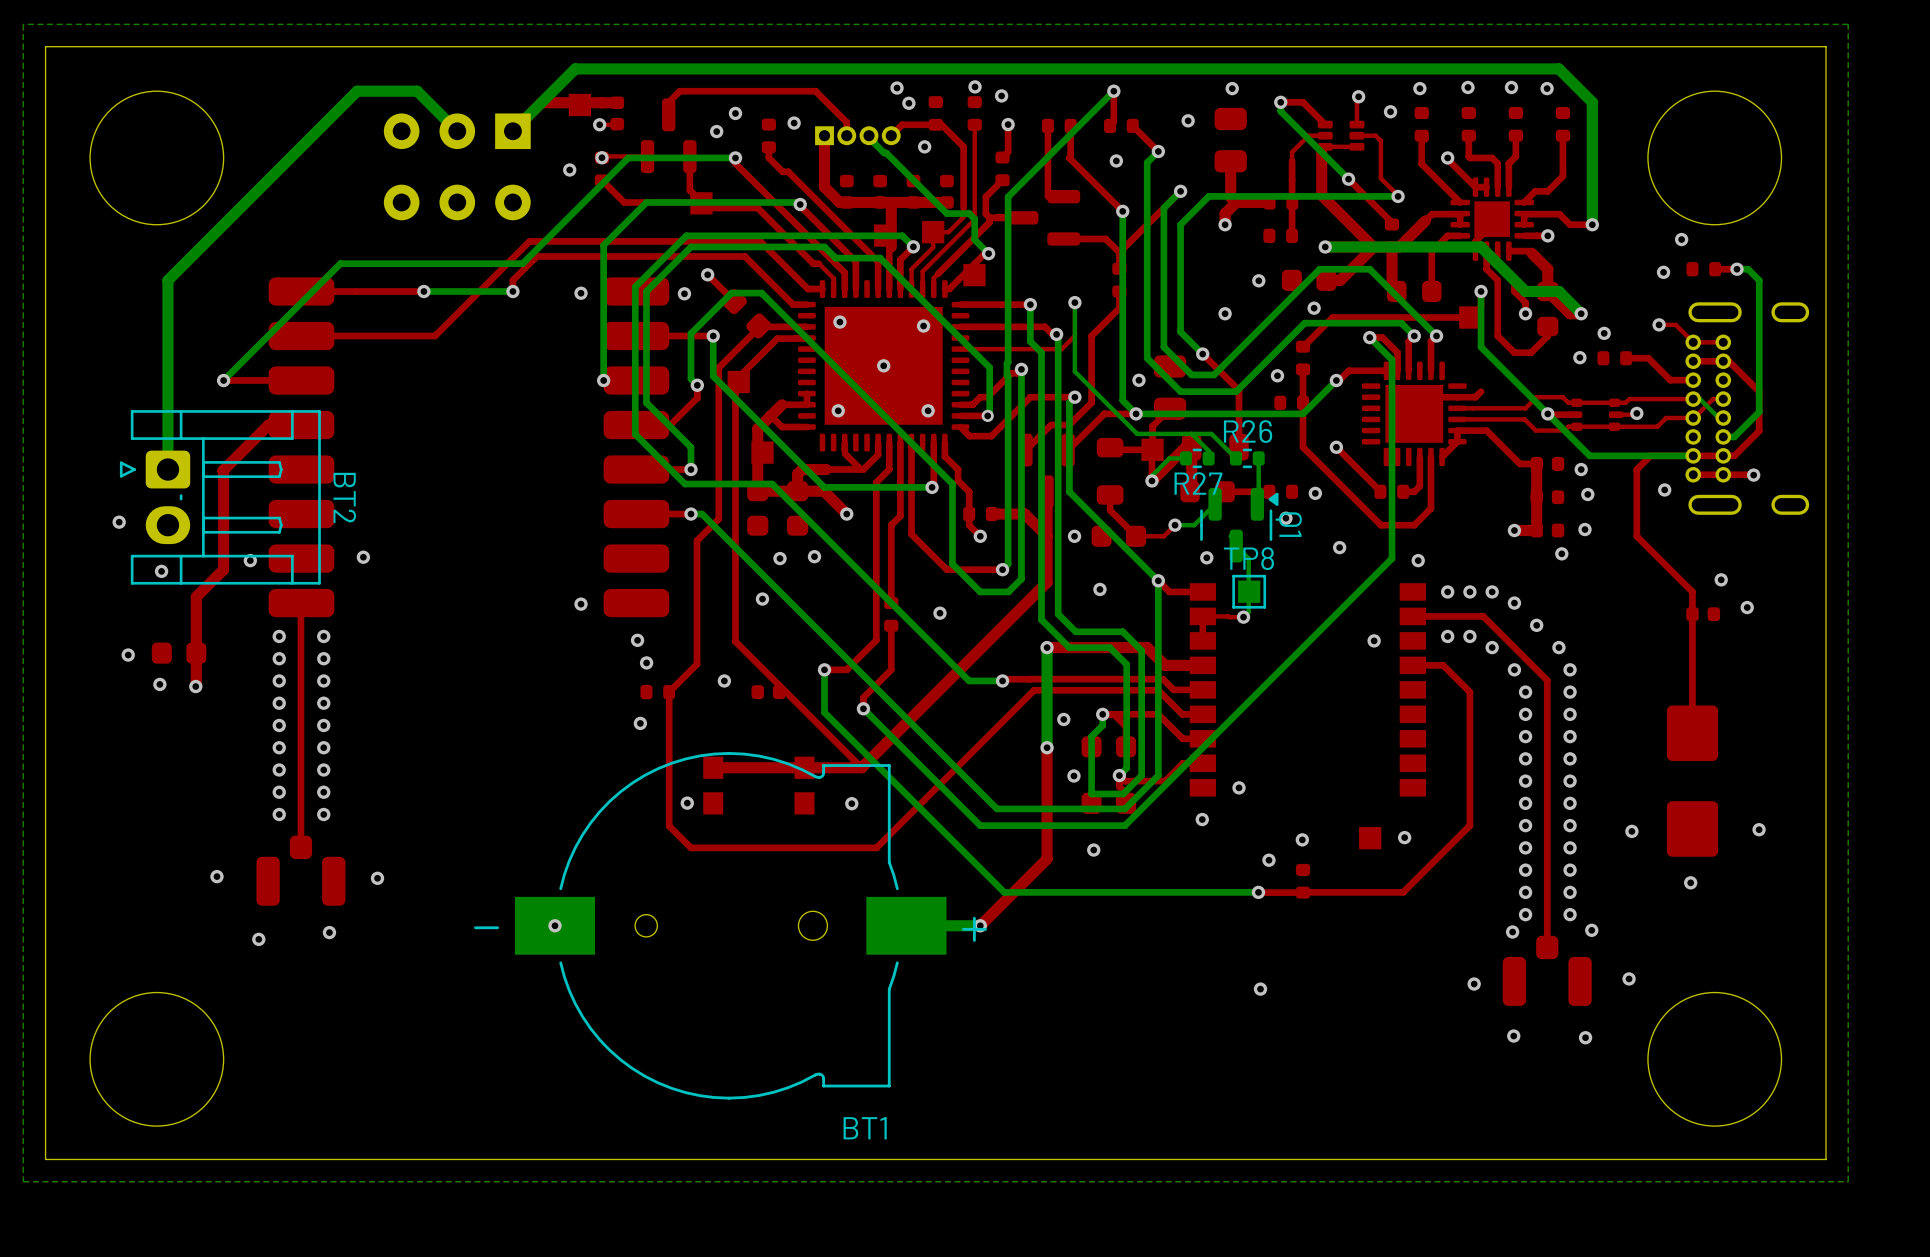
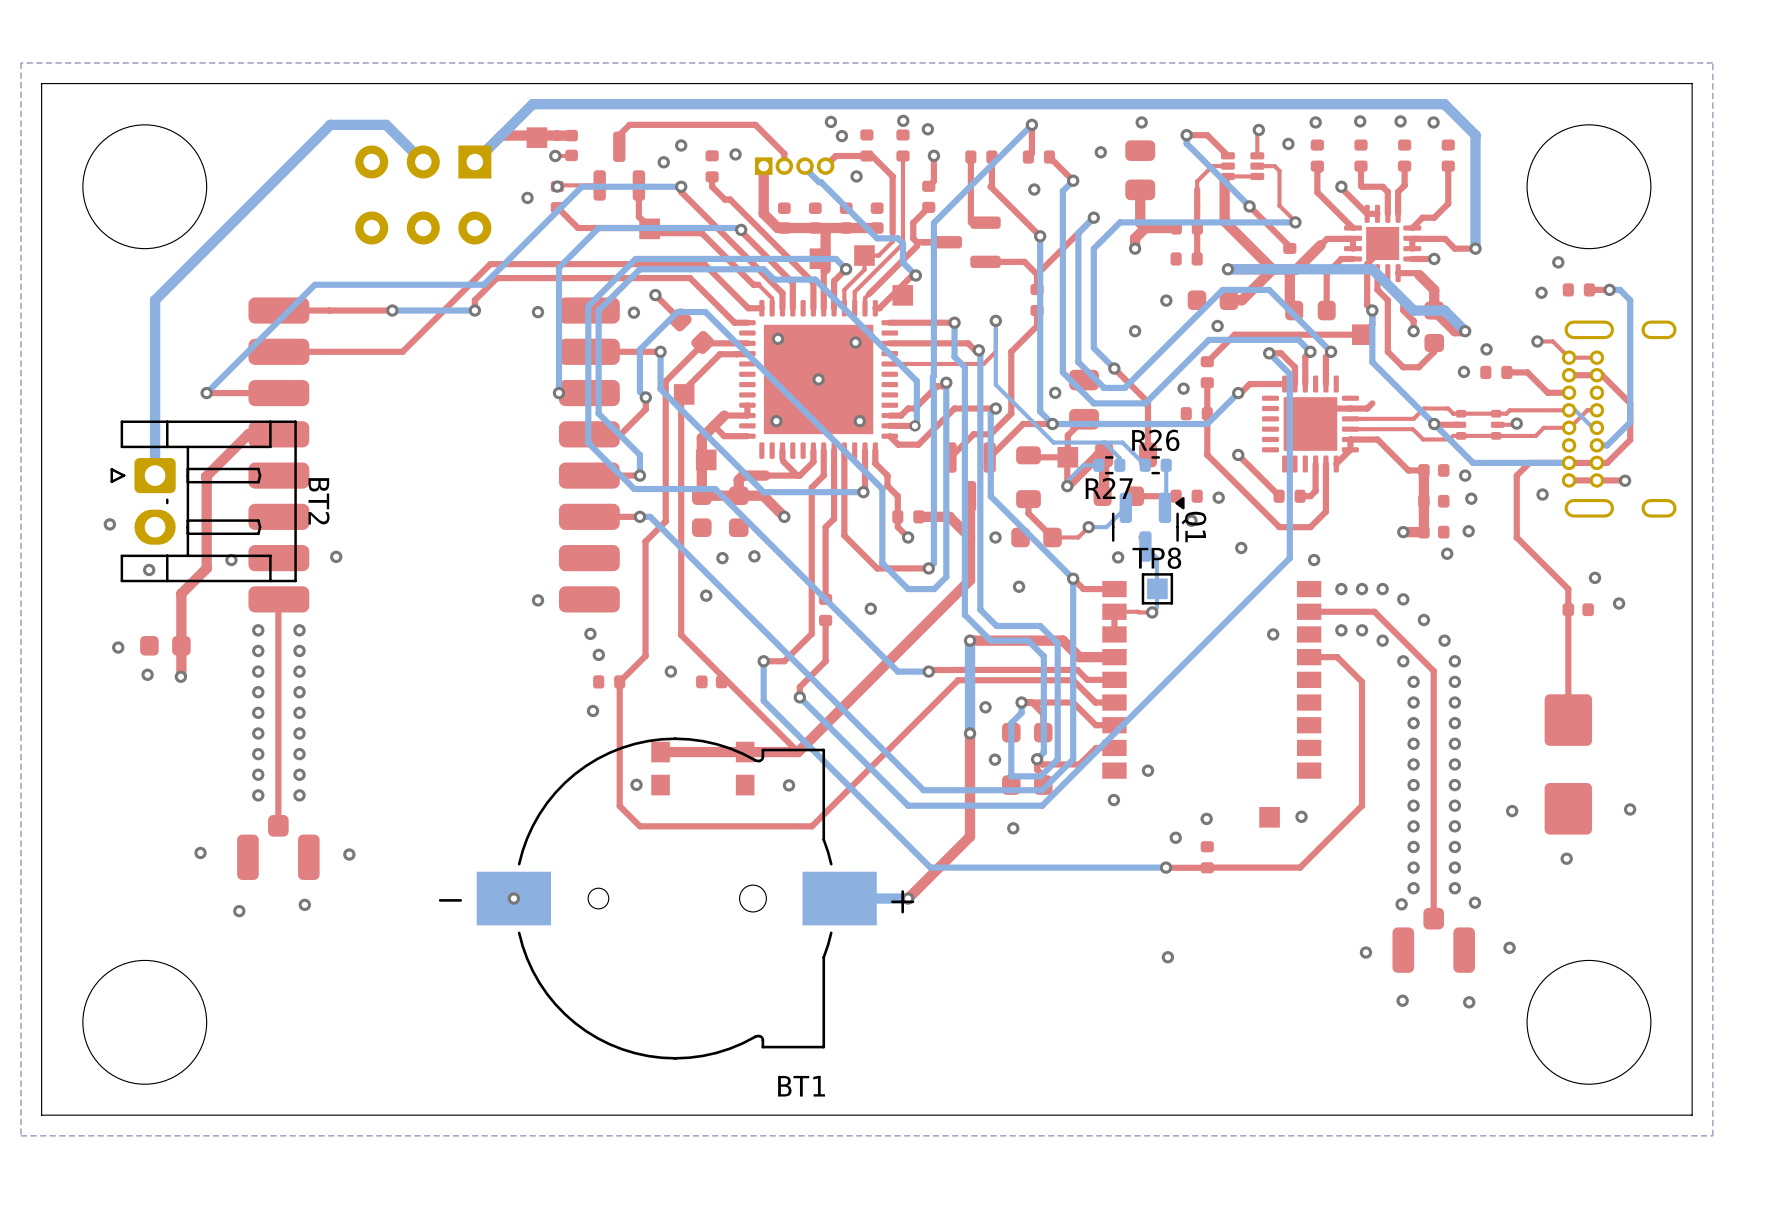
top track: none -> (1367, 273) (1367, 305) (1372, 310)

